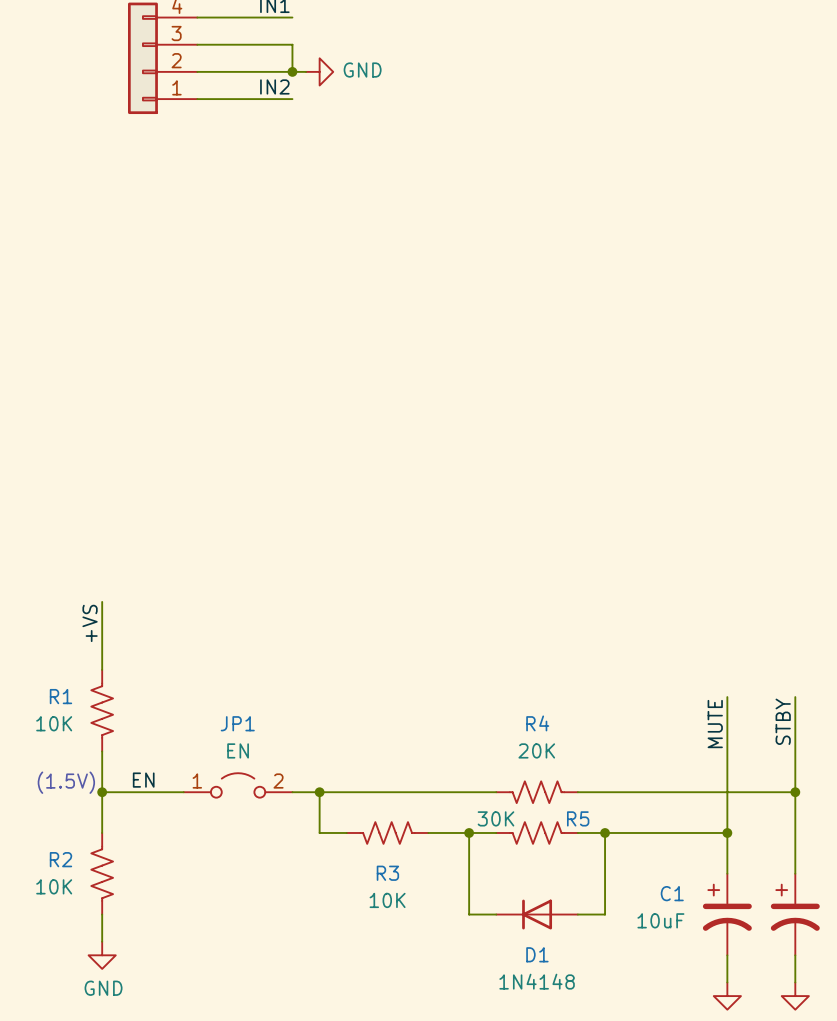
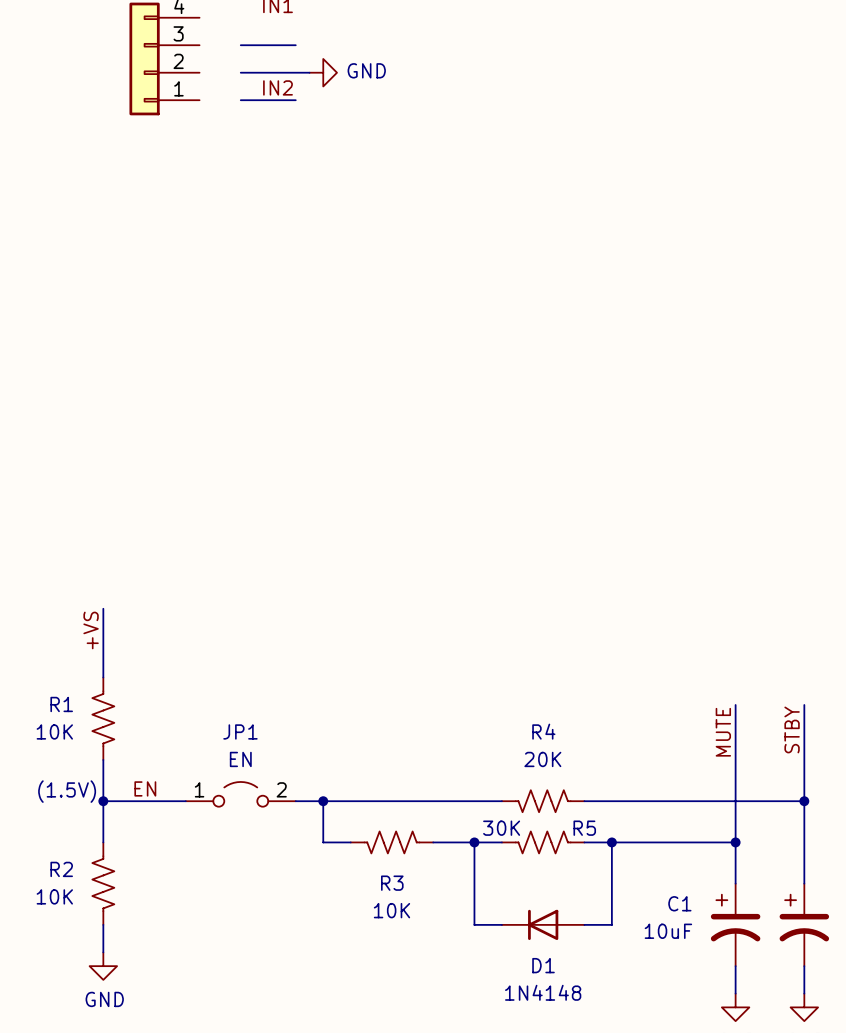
wire: (197, 17) (292, 17) -> none
wire: (197, 44) (238, 44) -> none
wire: (292, 44) (292, 71) -> none
wire: (197, 71) (238, 71) -> none
junction: (292, 71) -> none
wire: (197, 99) (238, 99) -> none

